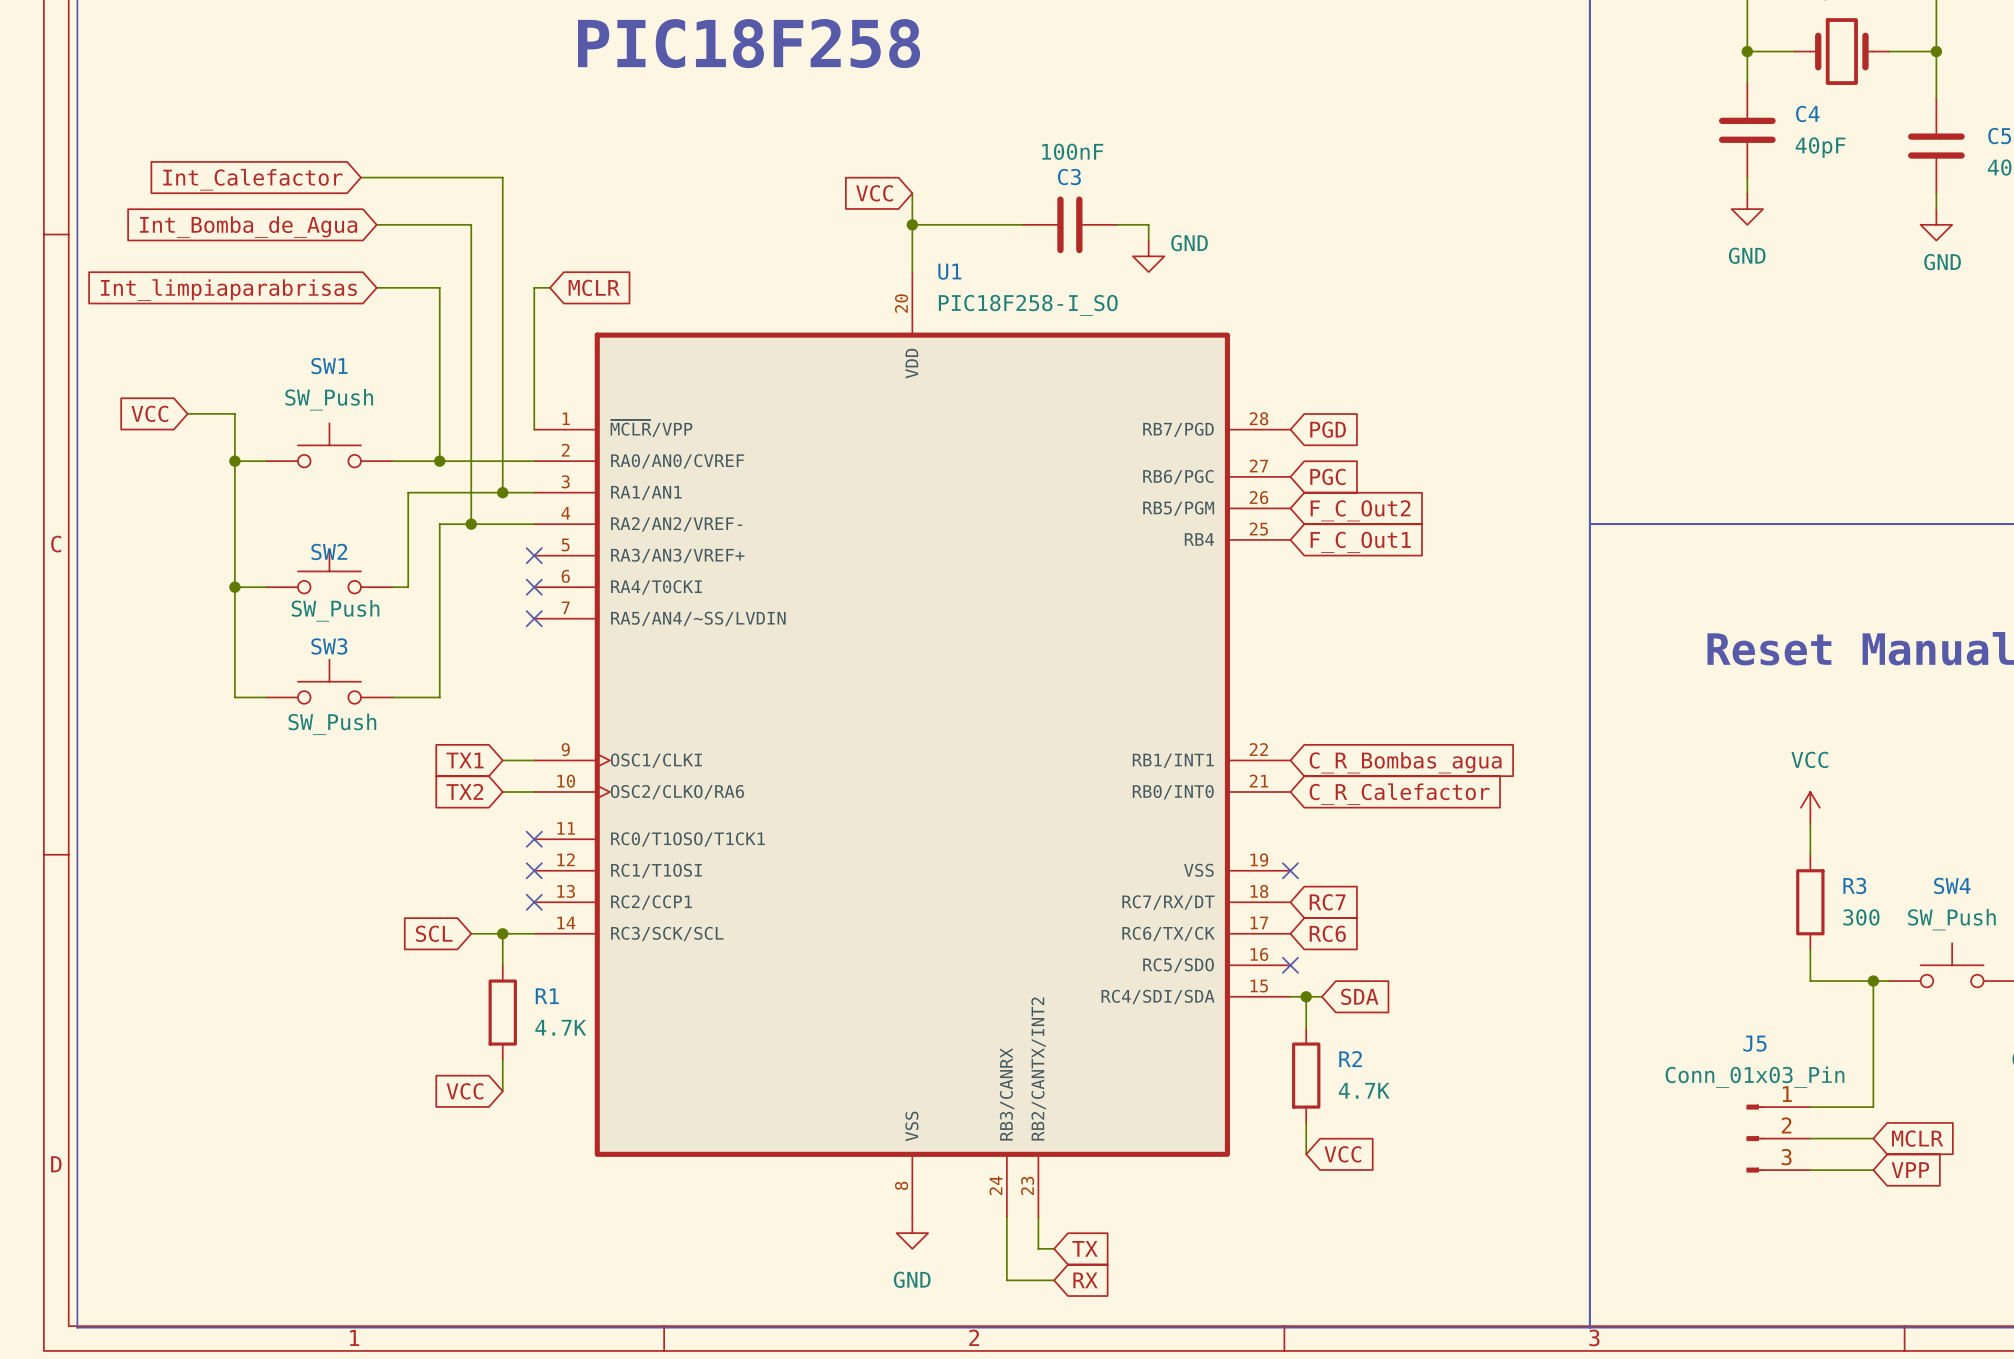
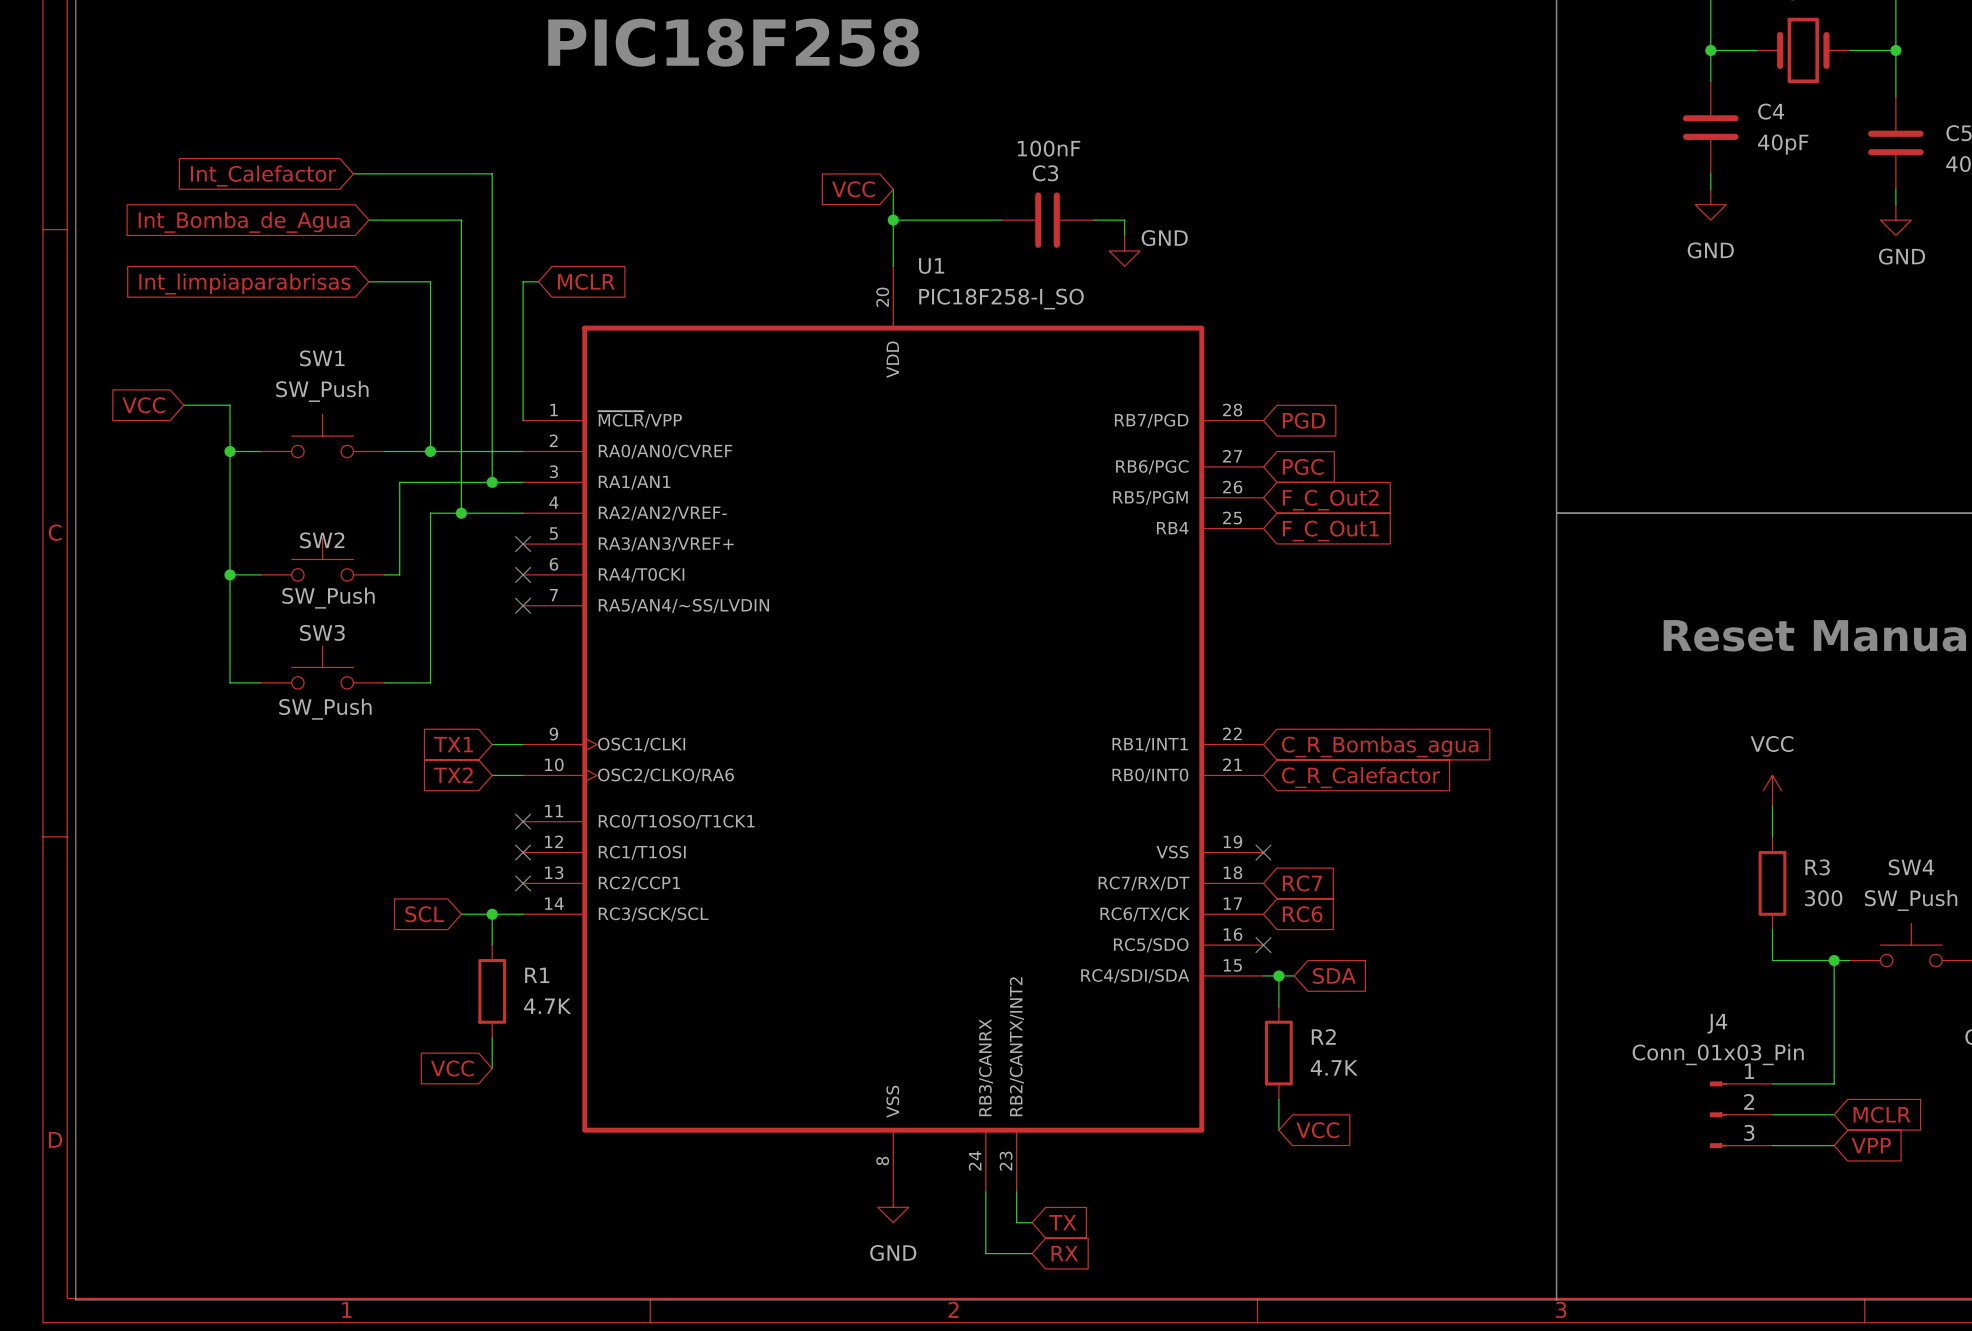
J5 name: J5 (1754, 1043) -> J4 (1717, 1023)

